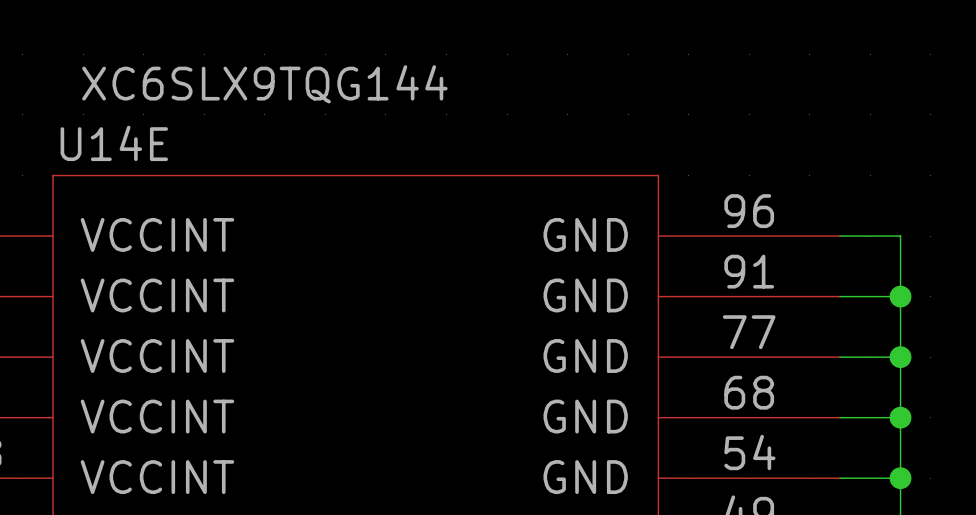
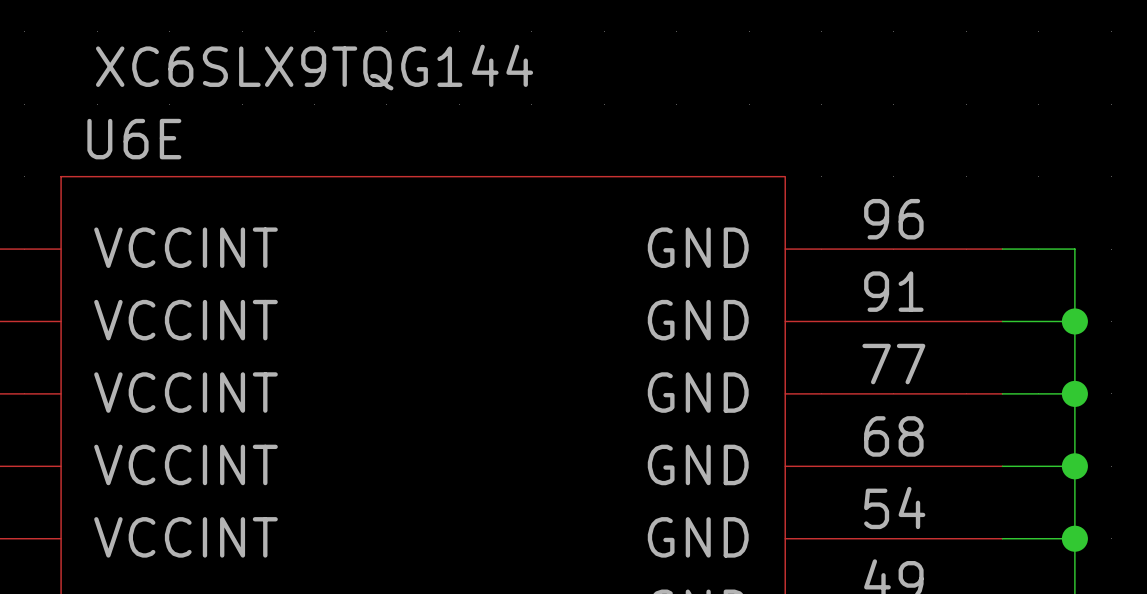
U14E name: U14E (114, 143) -> U6E (134, 139)

